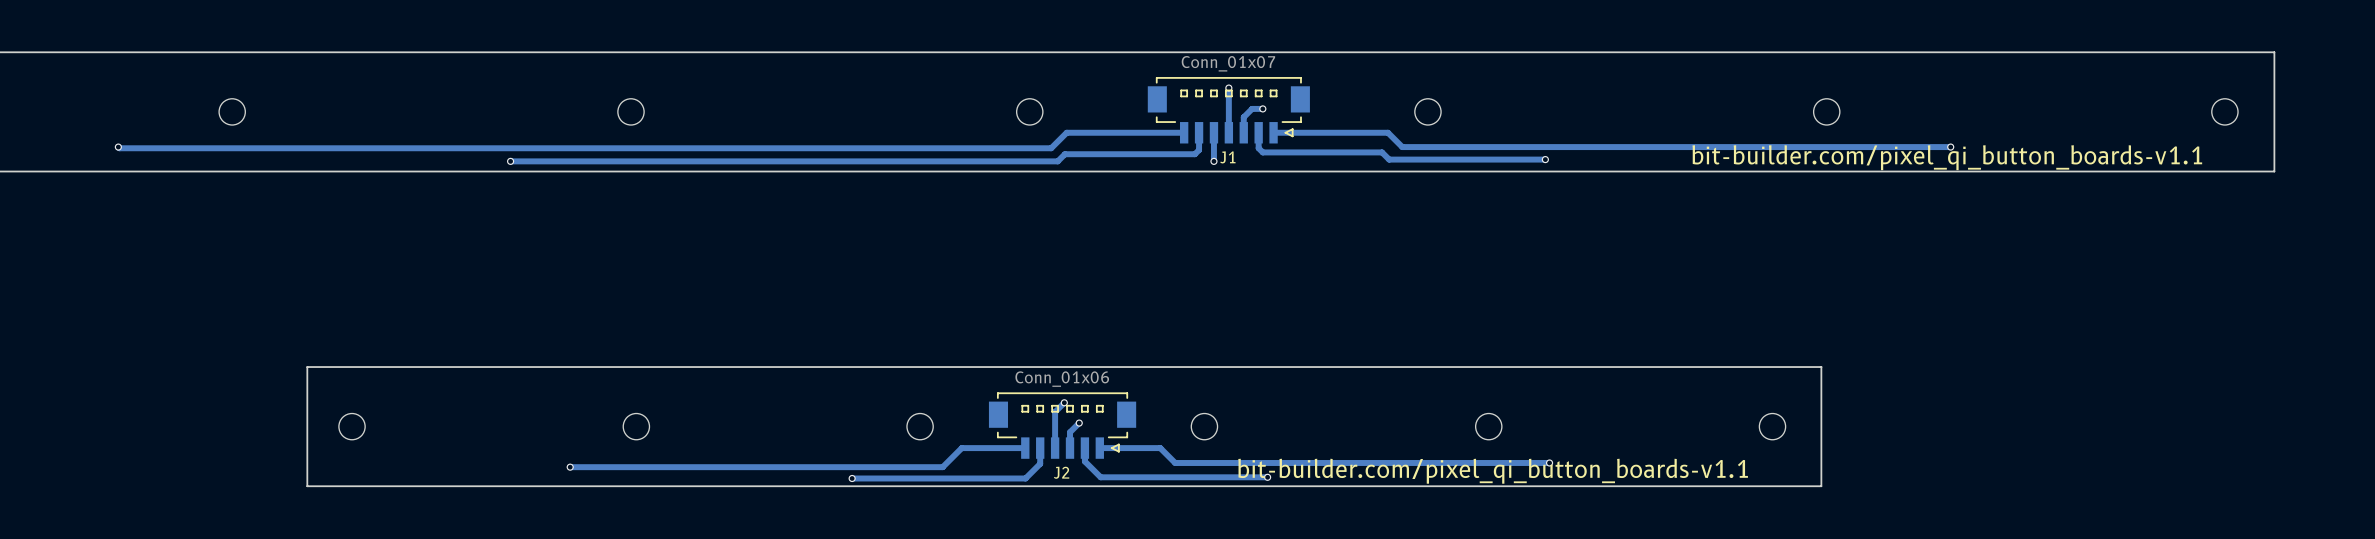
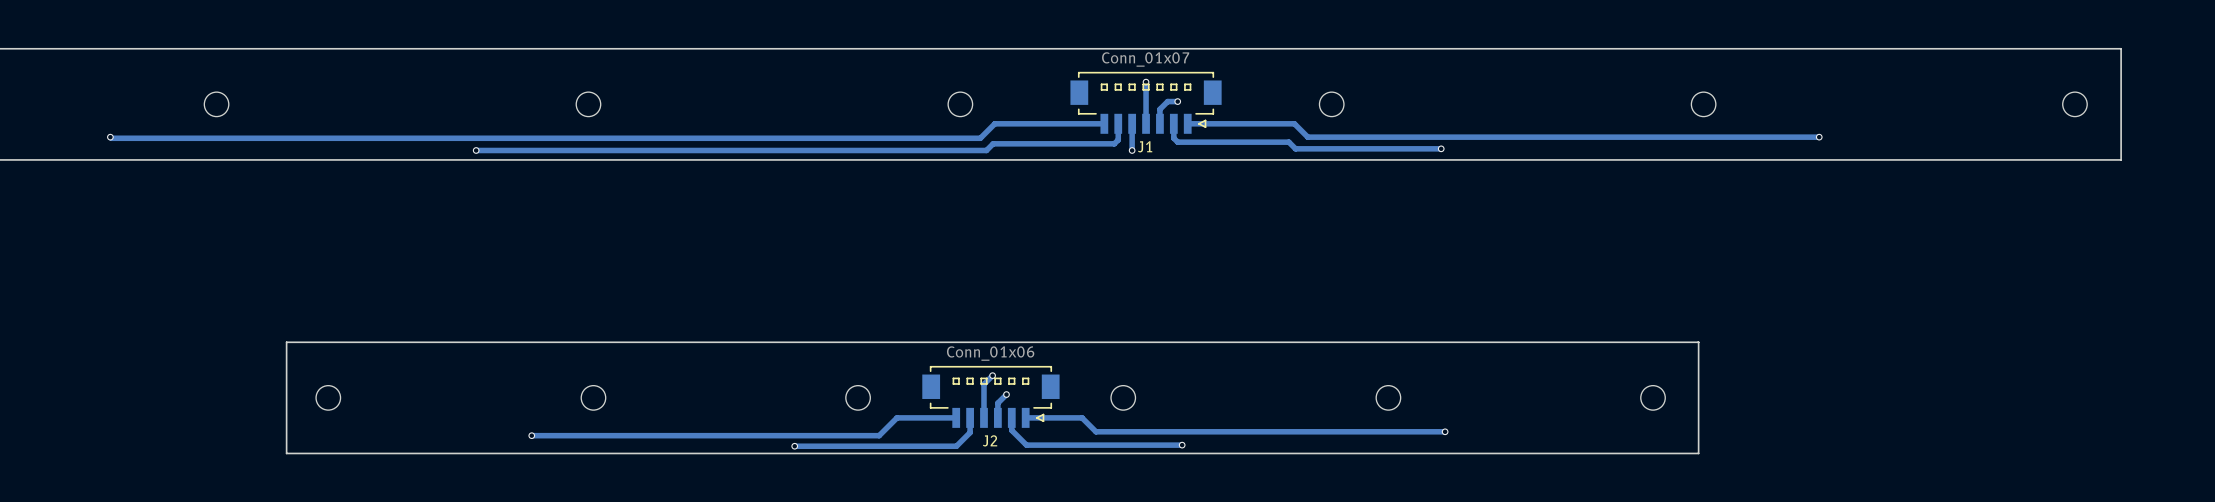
text: bit-builder.com/pixel_qi_button_boards-v1.1 (1947, 157) -> none
text: bit-builder.com/pixel_qi_button_boards-v1.1 (1493, 471) -> none

